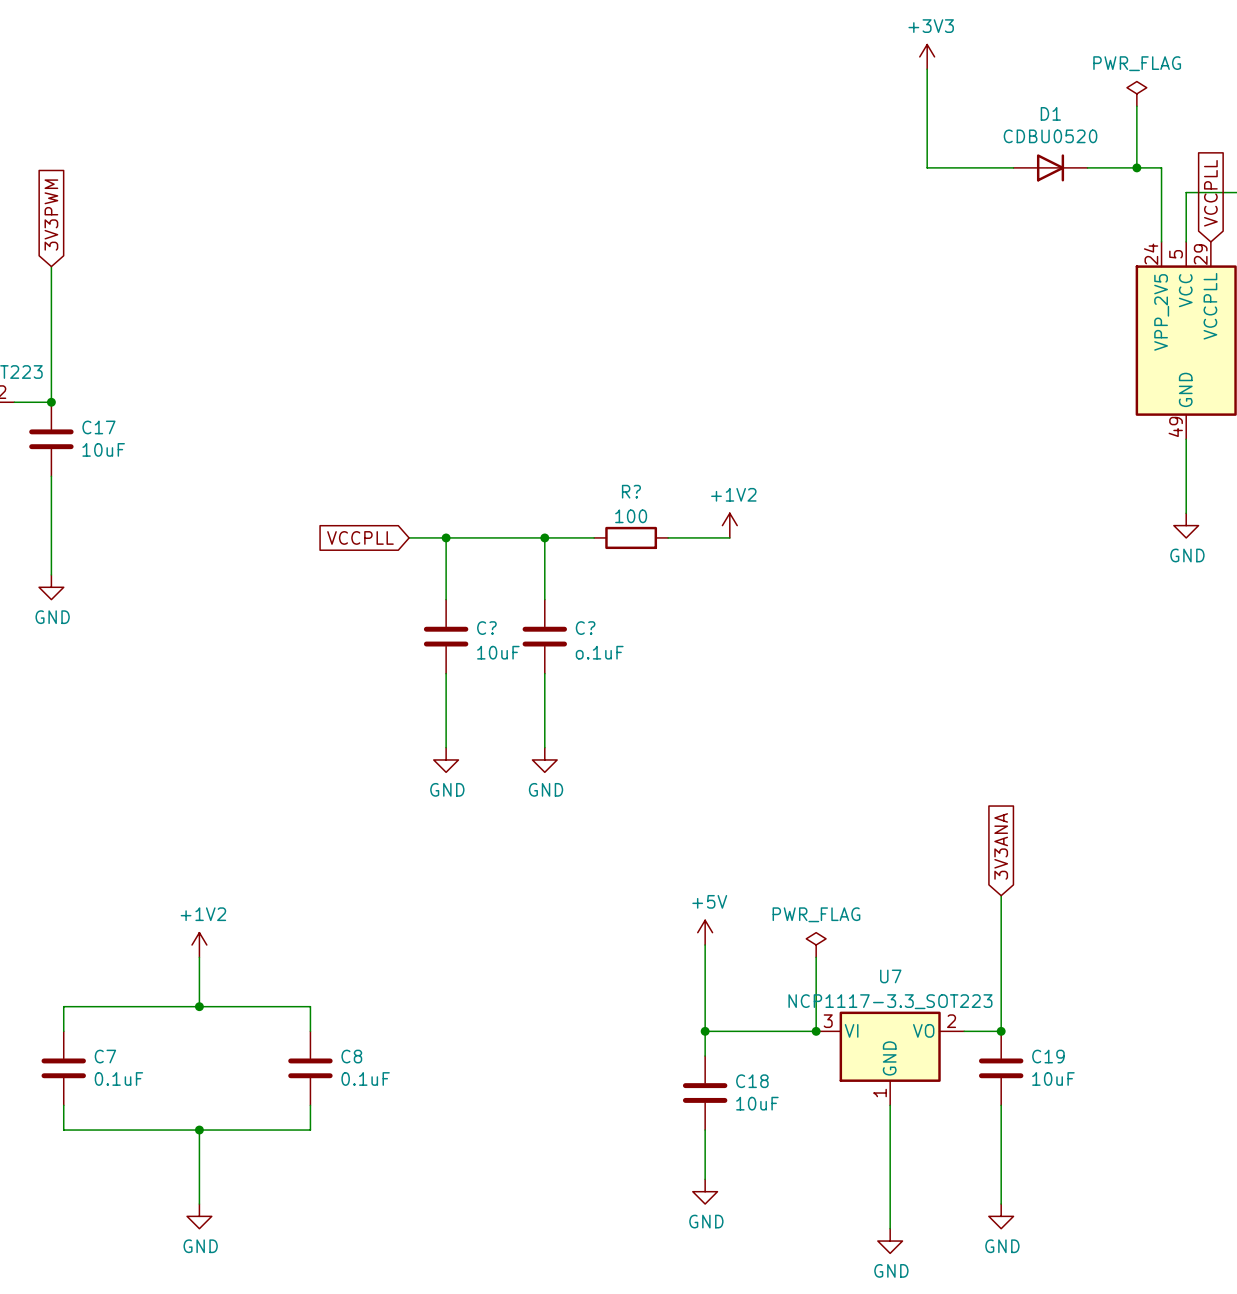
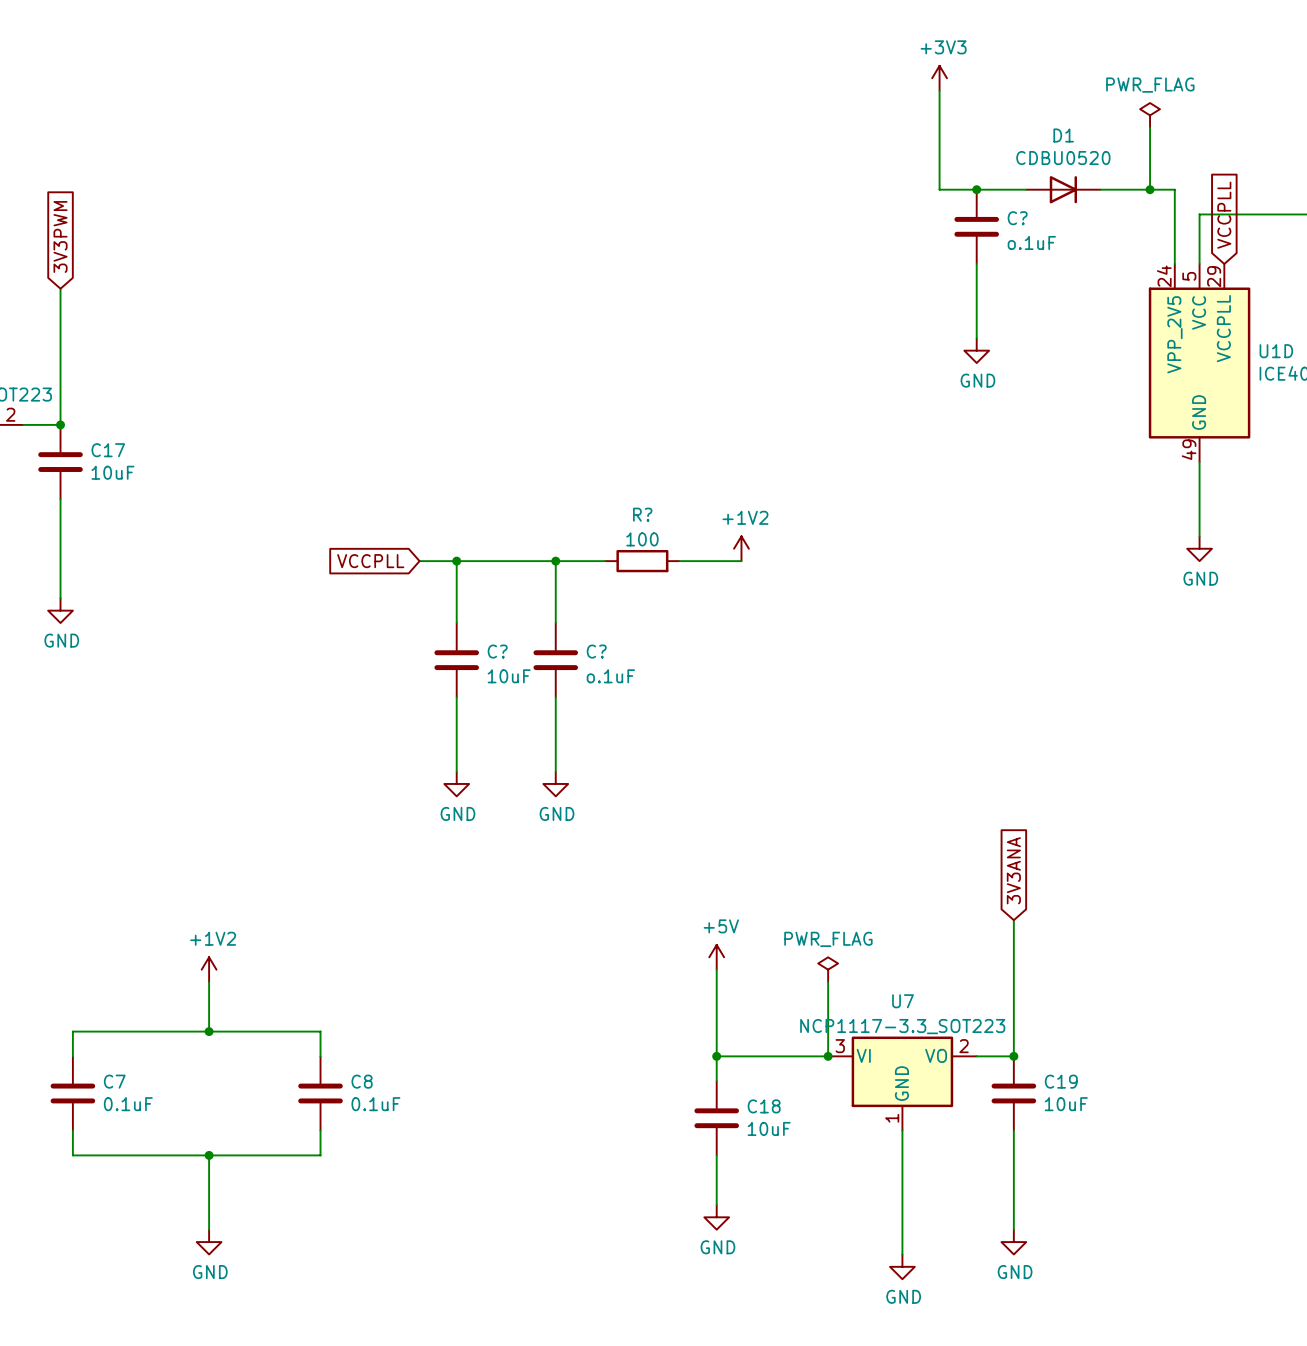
junction: none -> (976, 189)
C?: none -> o.1uF (976, 226)
wire: none -> (976, 263) (976, 338)
power symbol: none -> GND (976, 350)

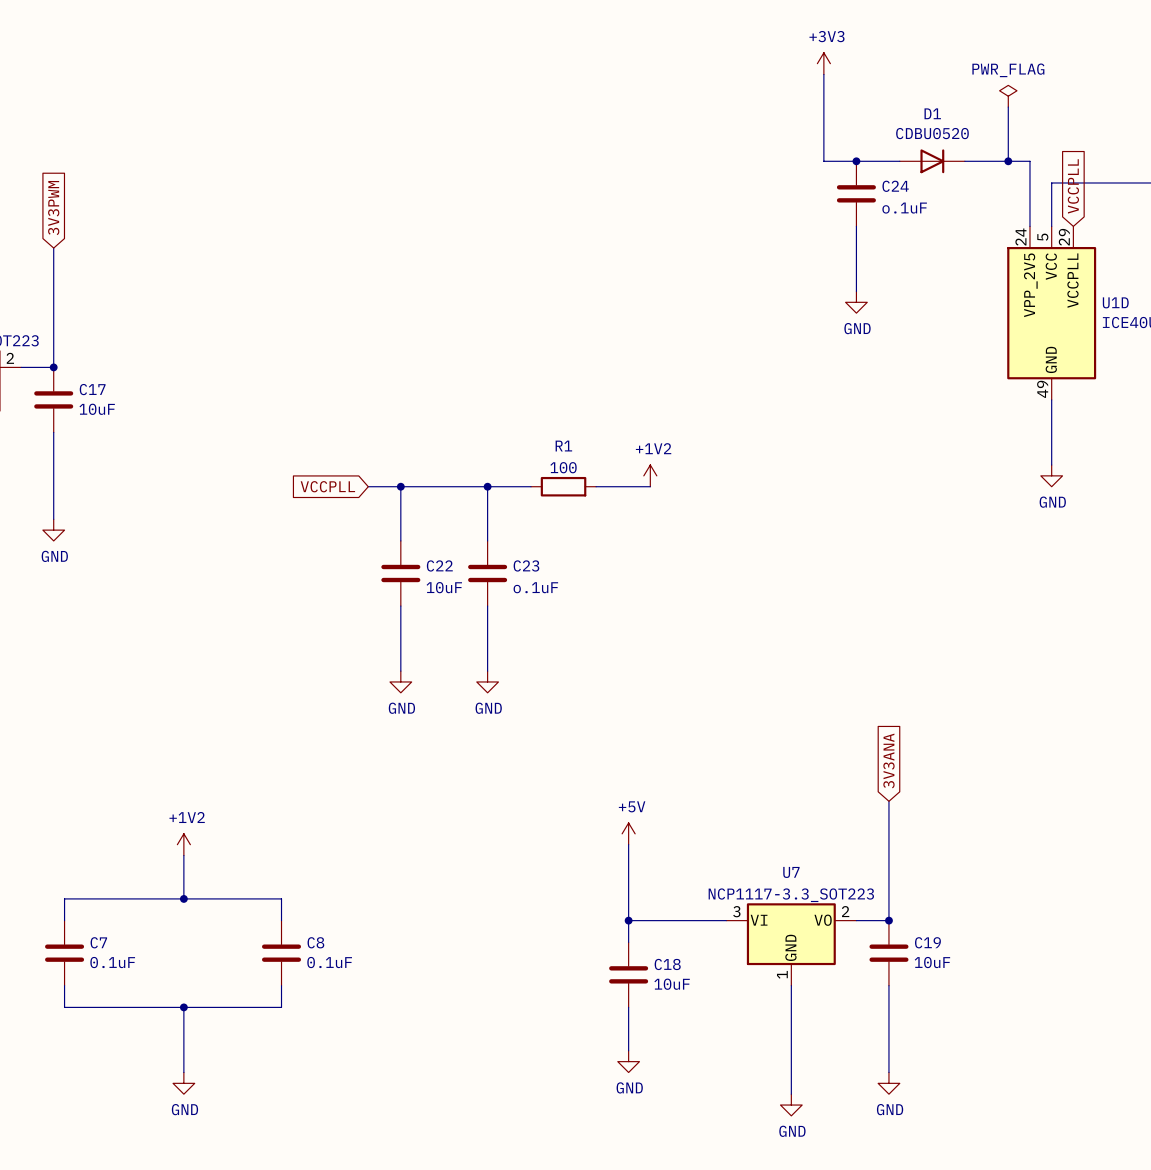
C? name: C? (1017, 218) -> C24 (895, 186)
R? name: R? (642, 514) -> R1 (563, 446)
C? name: C? (497, 651) -> C22 (439, 565)
C? name: C? (596, 651) -> C23 (526, 565)
power symbol: PWR_FLAG (828, 969) -> none
wire: (828, 982) (828, 1056) -> none
junction: (828, 1056) -> none

